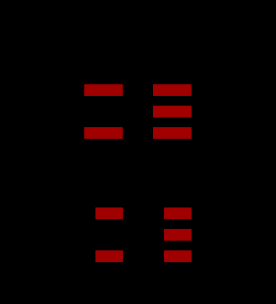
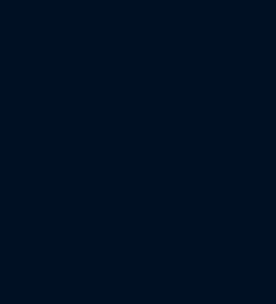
part: (137, 111) -> none
part: (143, 234) -> none

